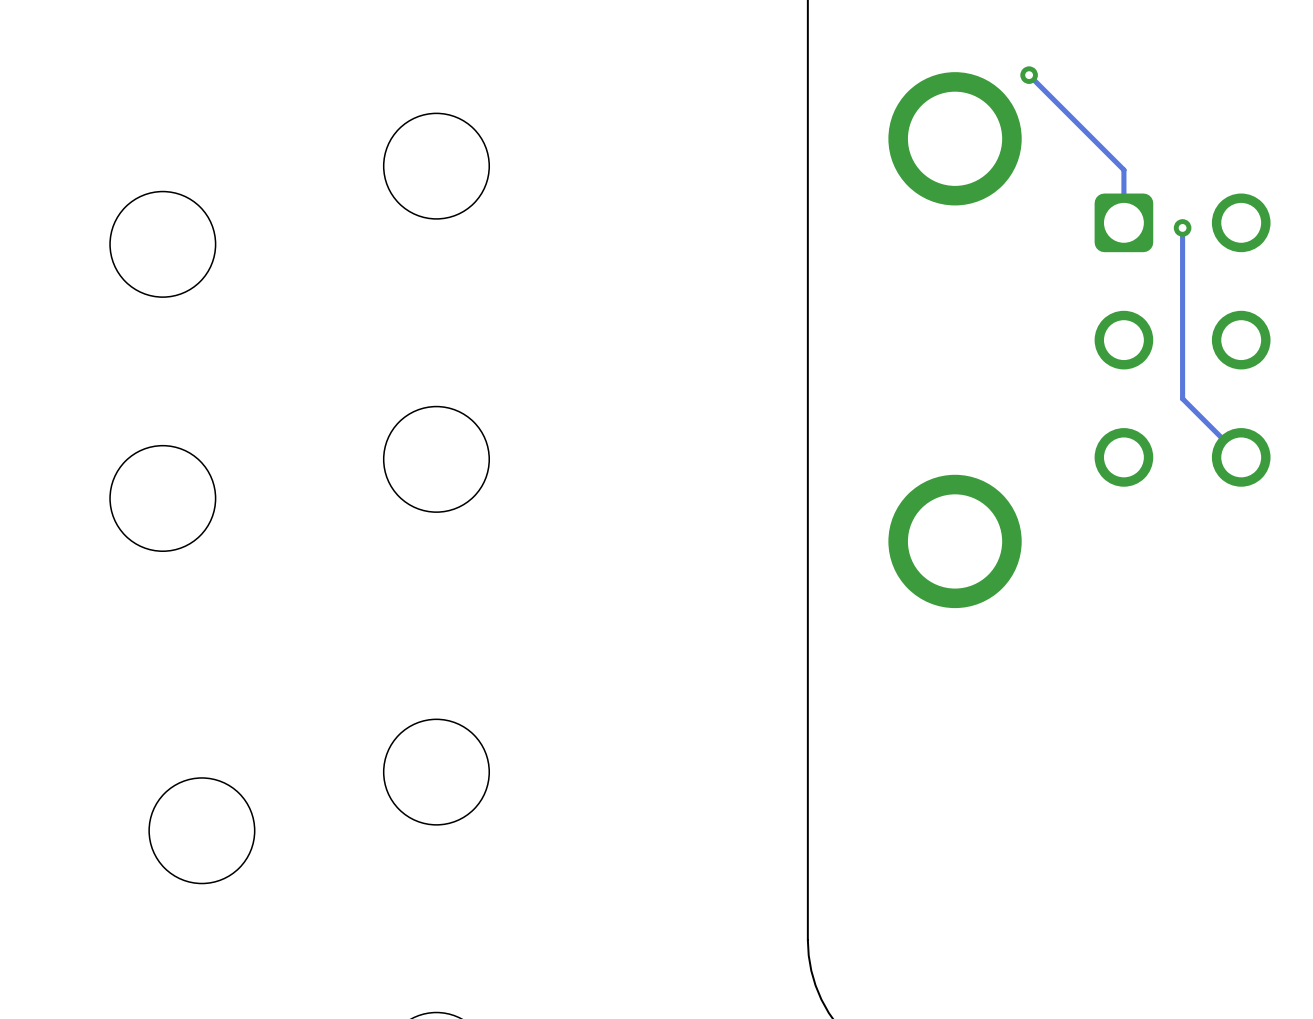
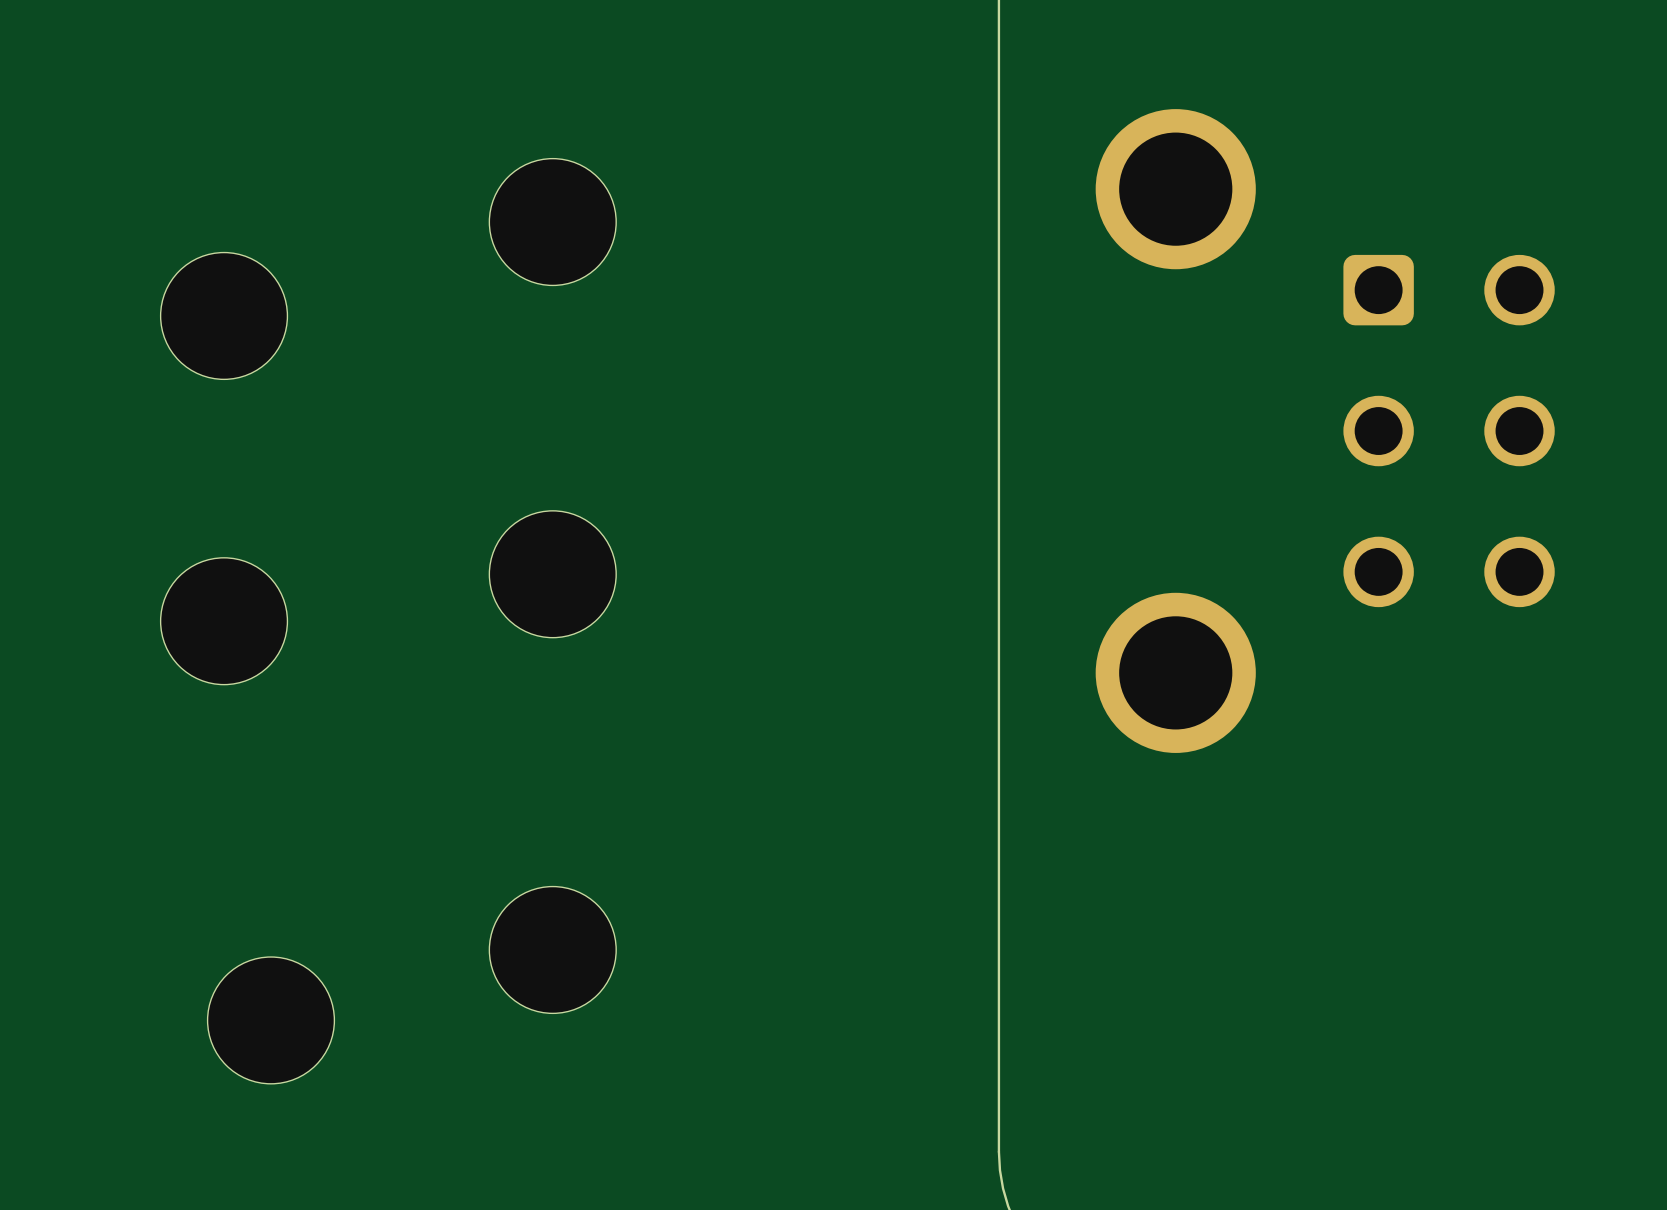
track: (1029, 75) (1123, 169) (1123, 222) -> none
via: (1029, 75) -> none
track: (1182, 227) (1182, 398) (1241, 457) -> none
via: (1182, 227) -> none

